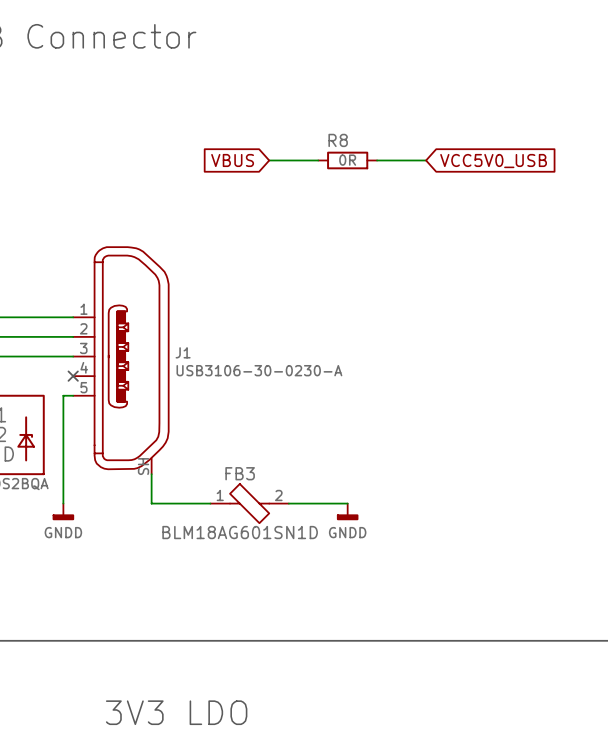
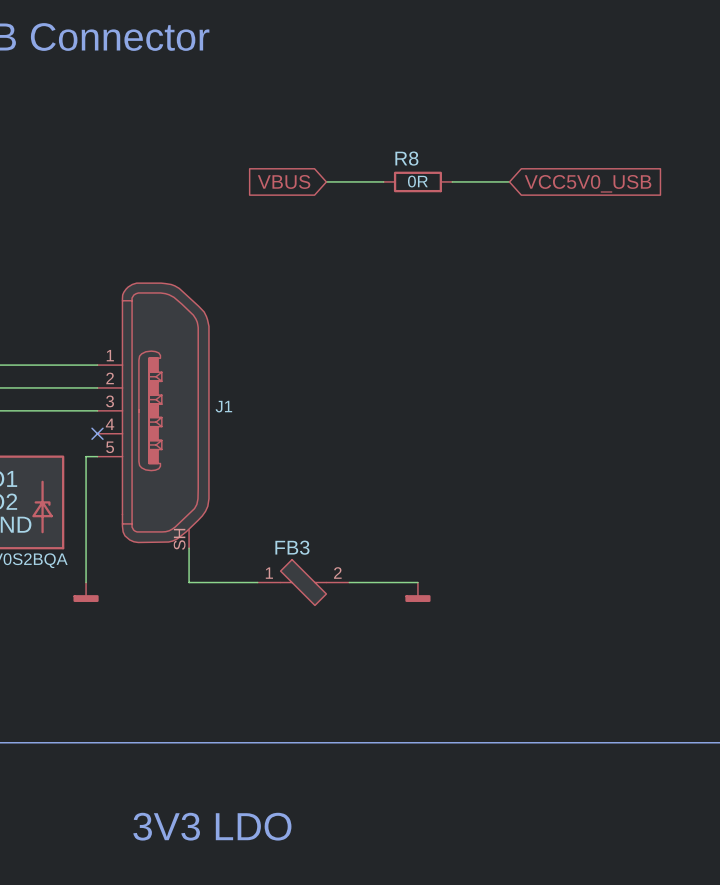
J1 value: USB3106-30-0230-A (259, 370) -> none
power symbol text: GNDD (63, 532) -> none
FB3 value: BLM18AG601SN1D (240, 532) -> none
power symbol text: GNDD (347, 532) -> none

